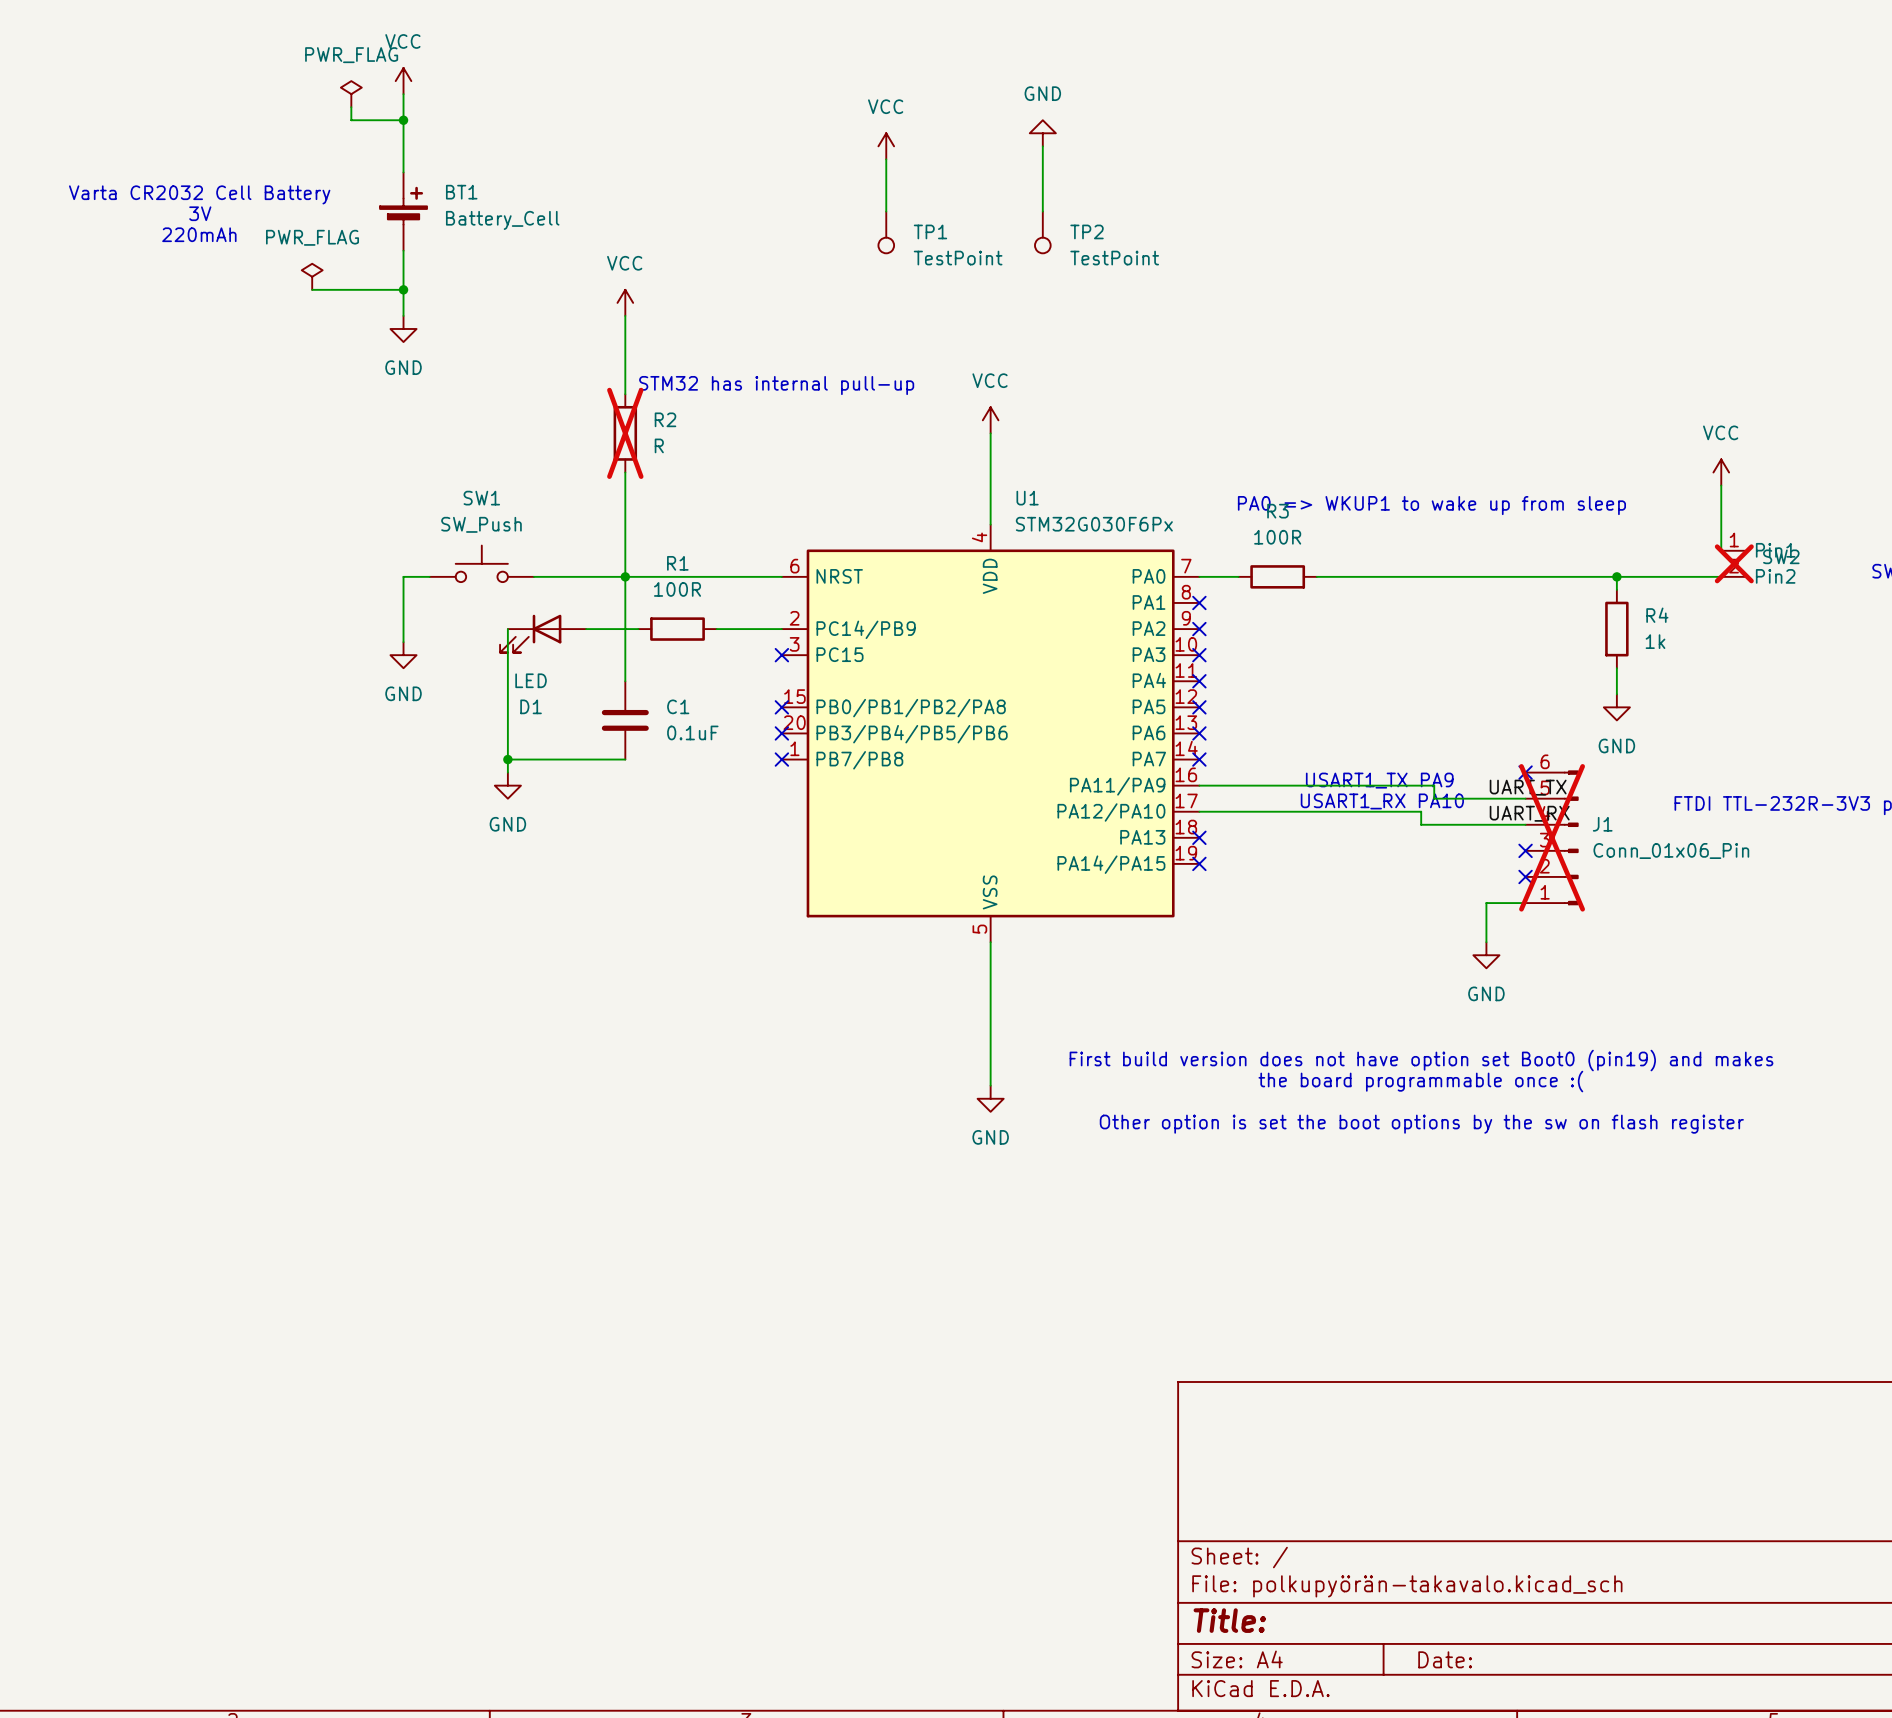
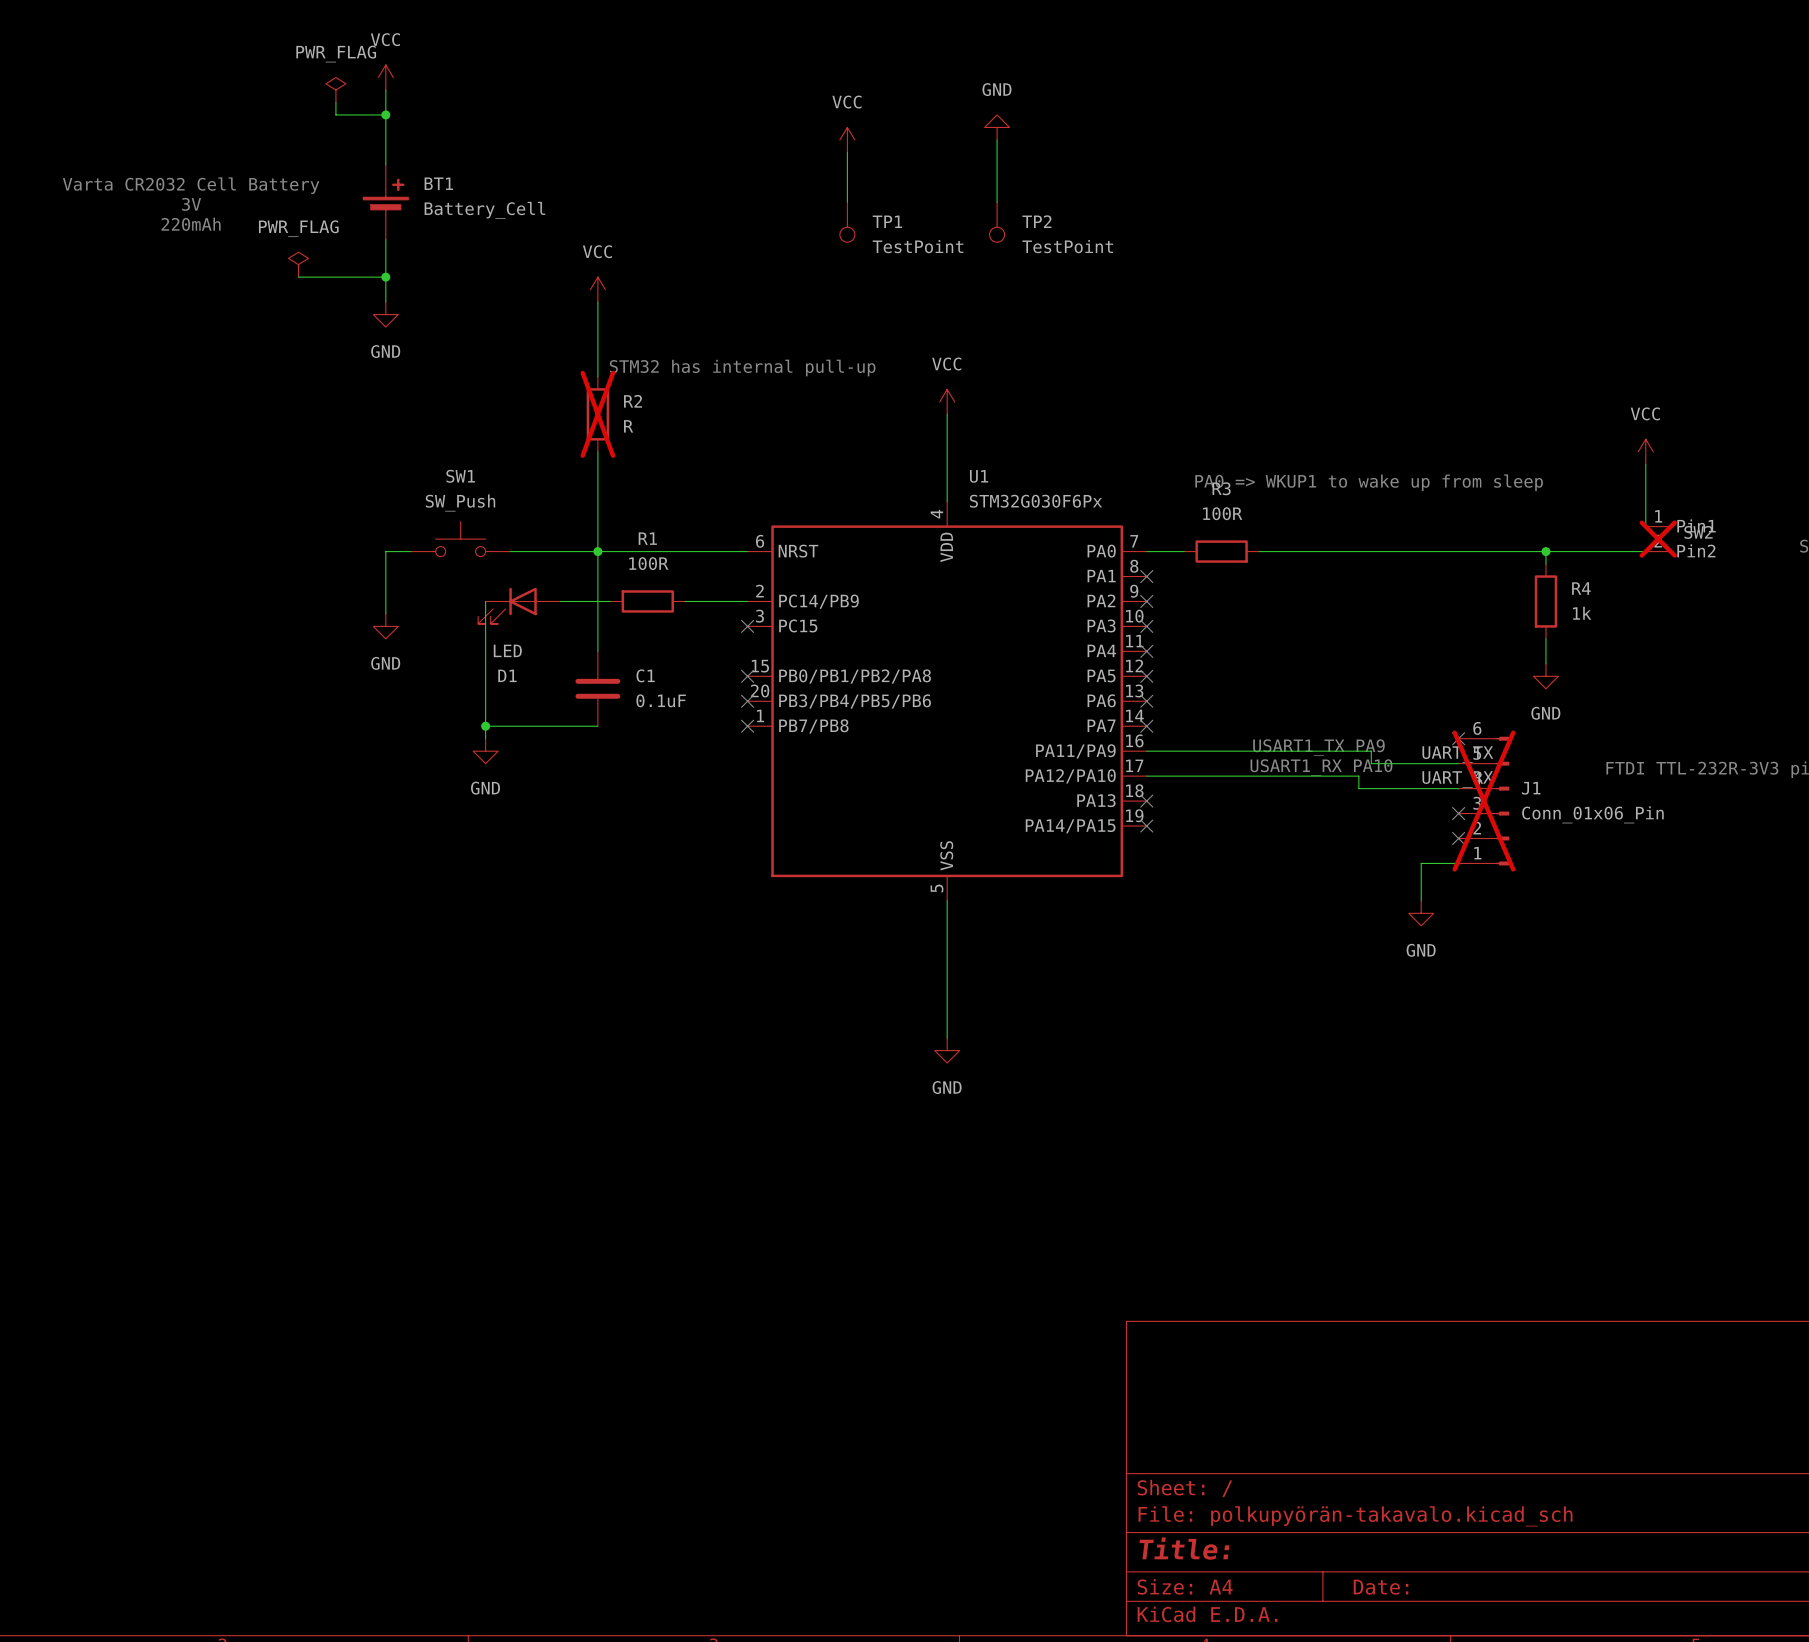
text: First build version does not have option set Boot0 (pin19) and makes (1421, 1060) -> none
text: the board programmable once :( (1420, 1081) -> none
text: Other option is set the boot options by the sw on flash register (1421, 1124) -> none

